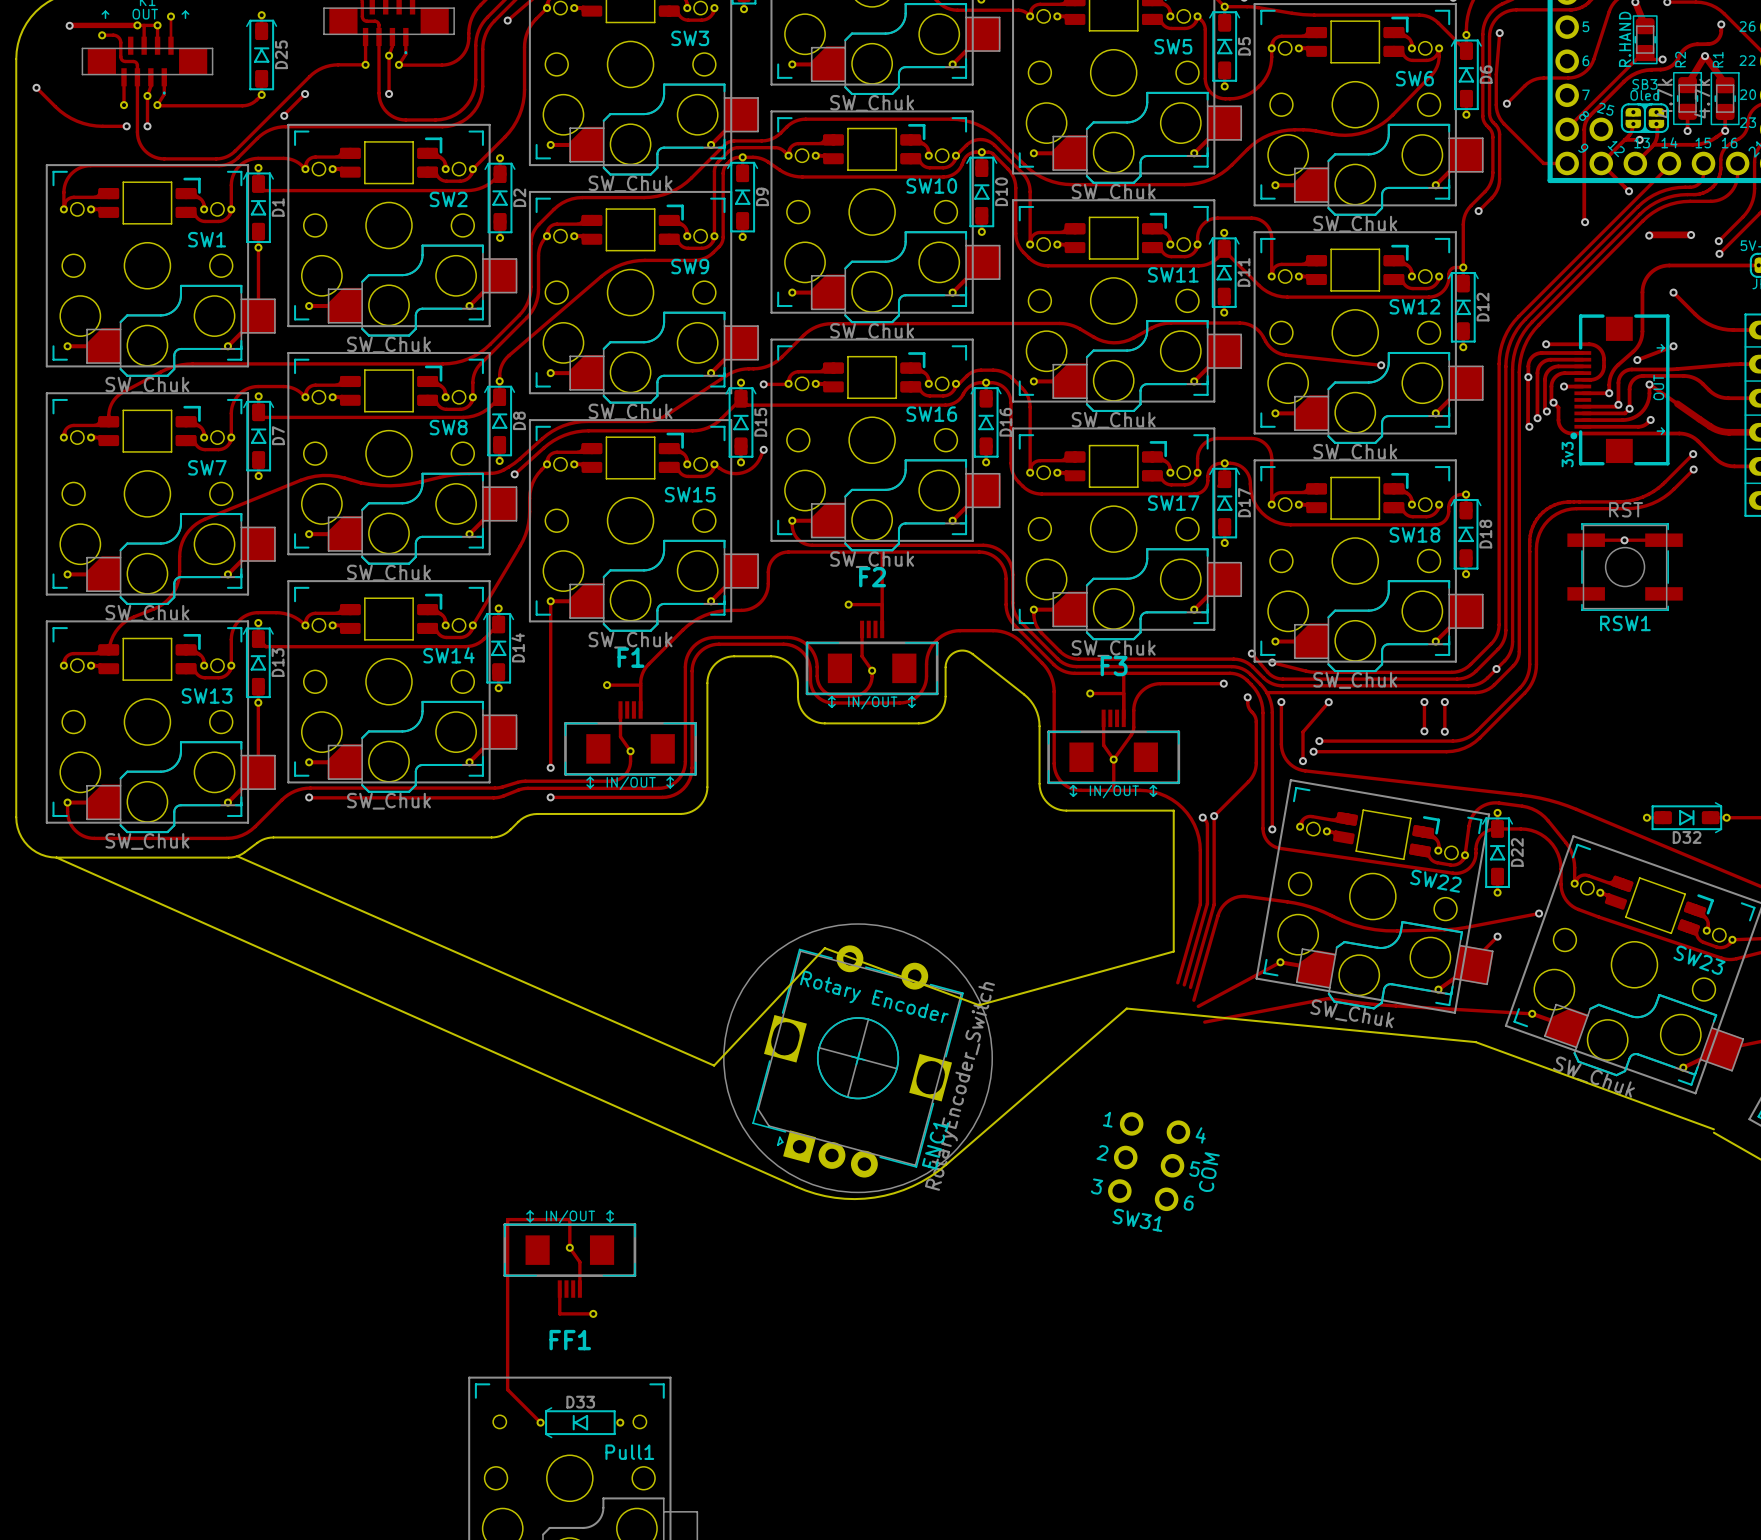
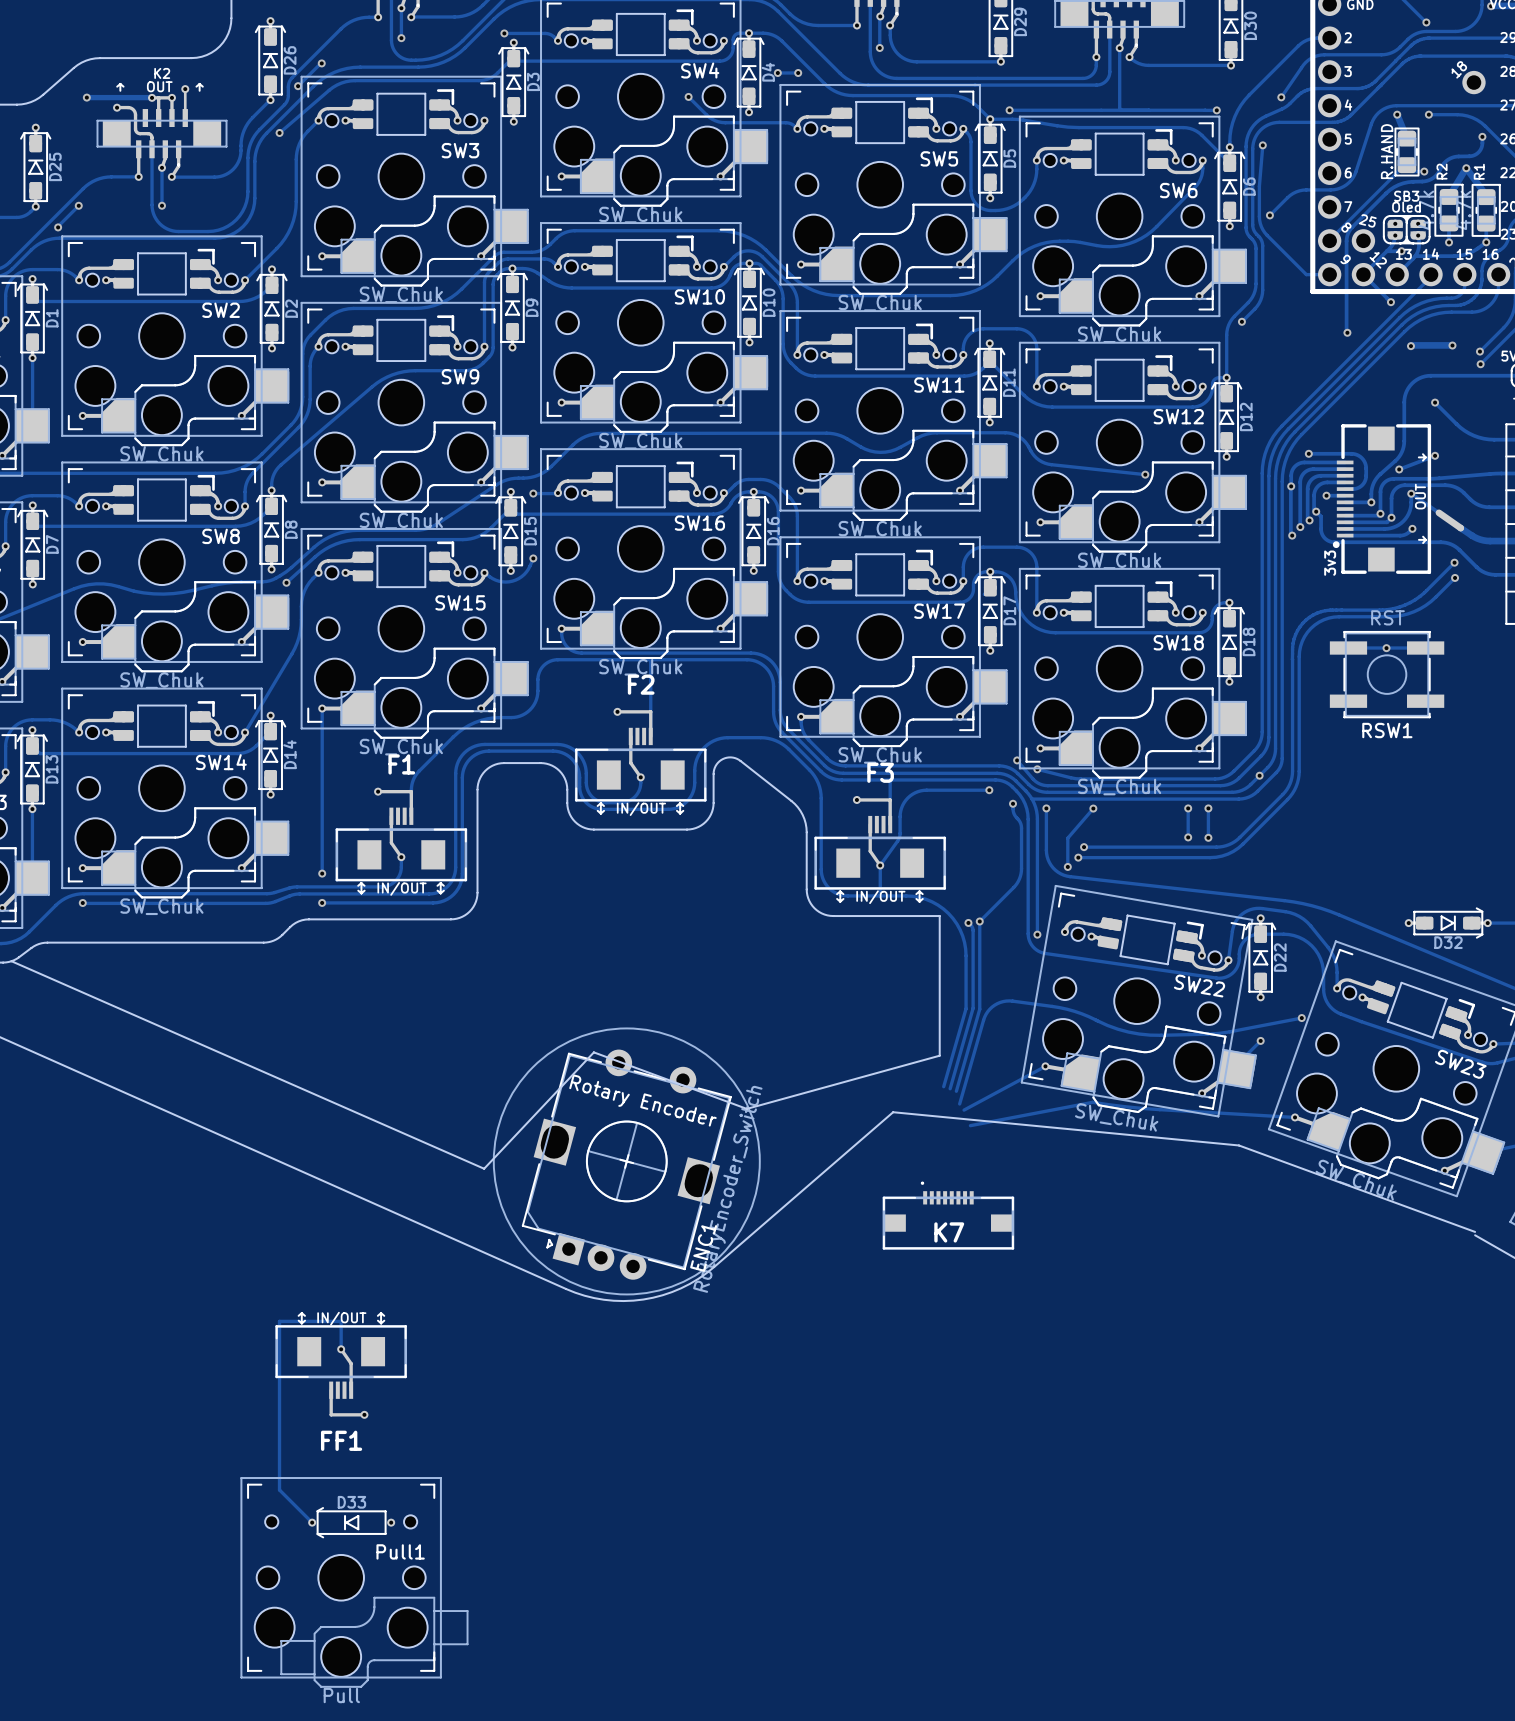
K7: none -> (948, 1215)
SW31: (1149, 1161) -> none

